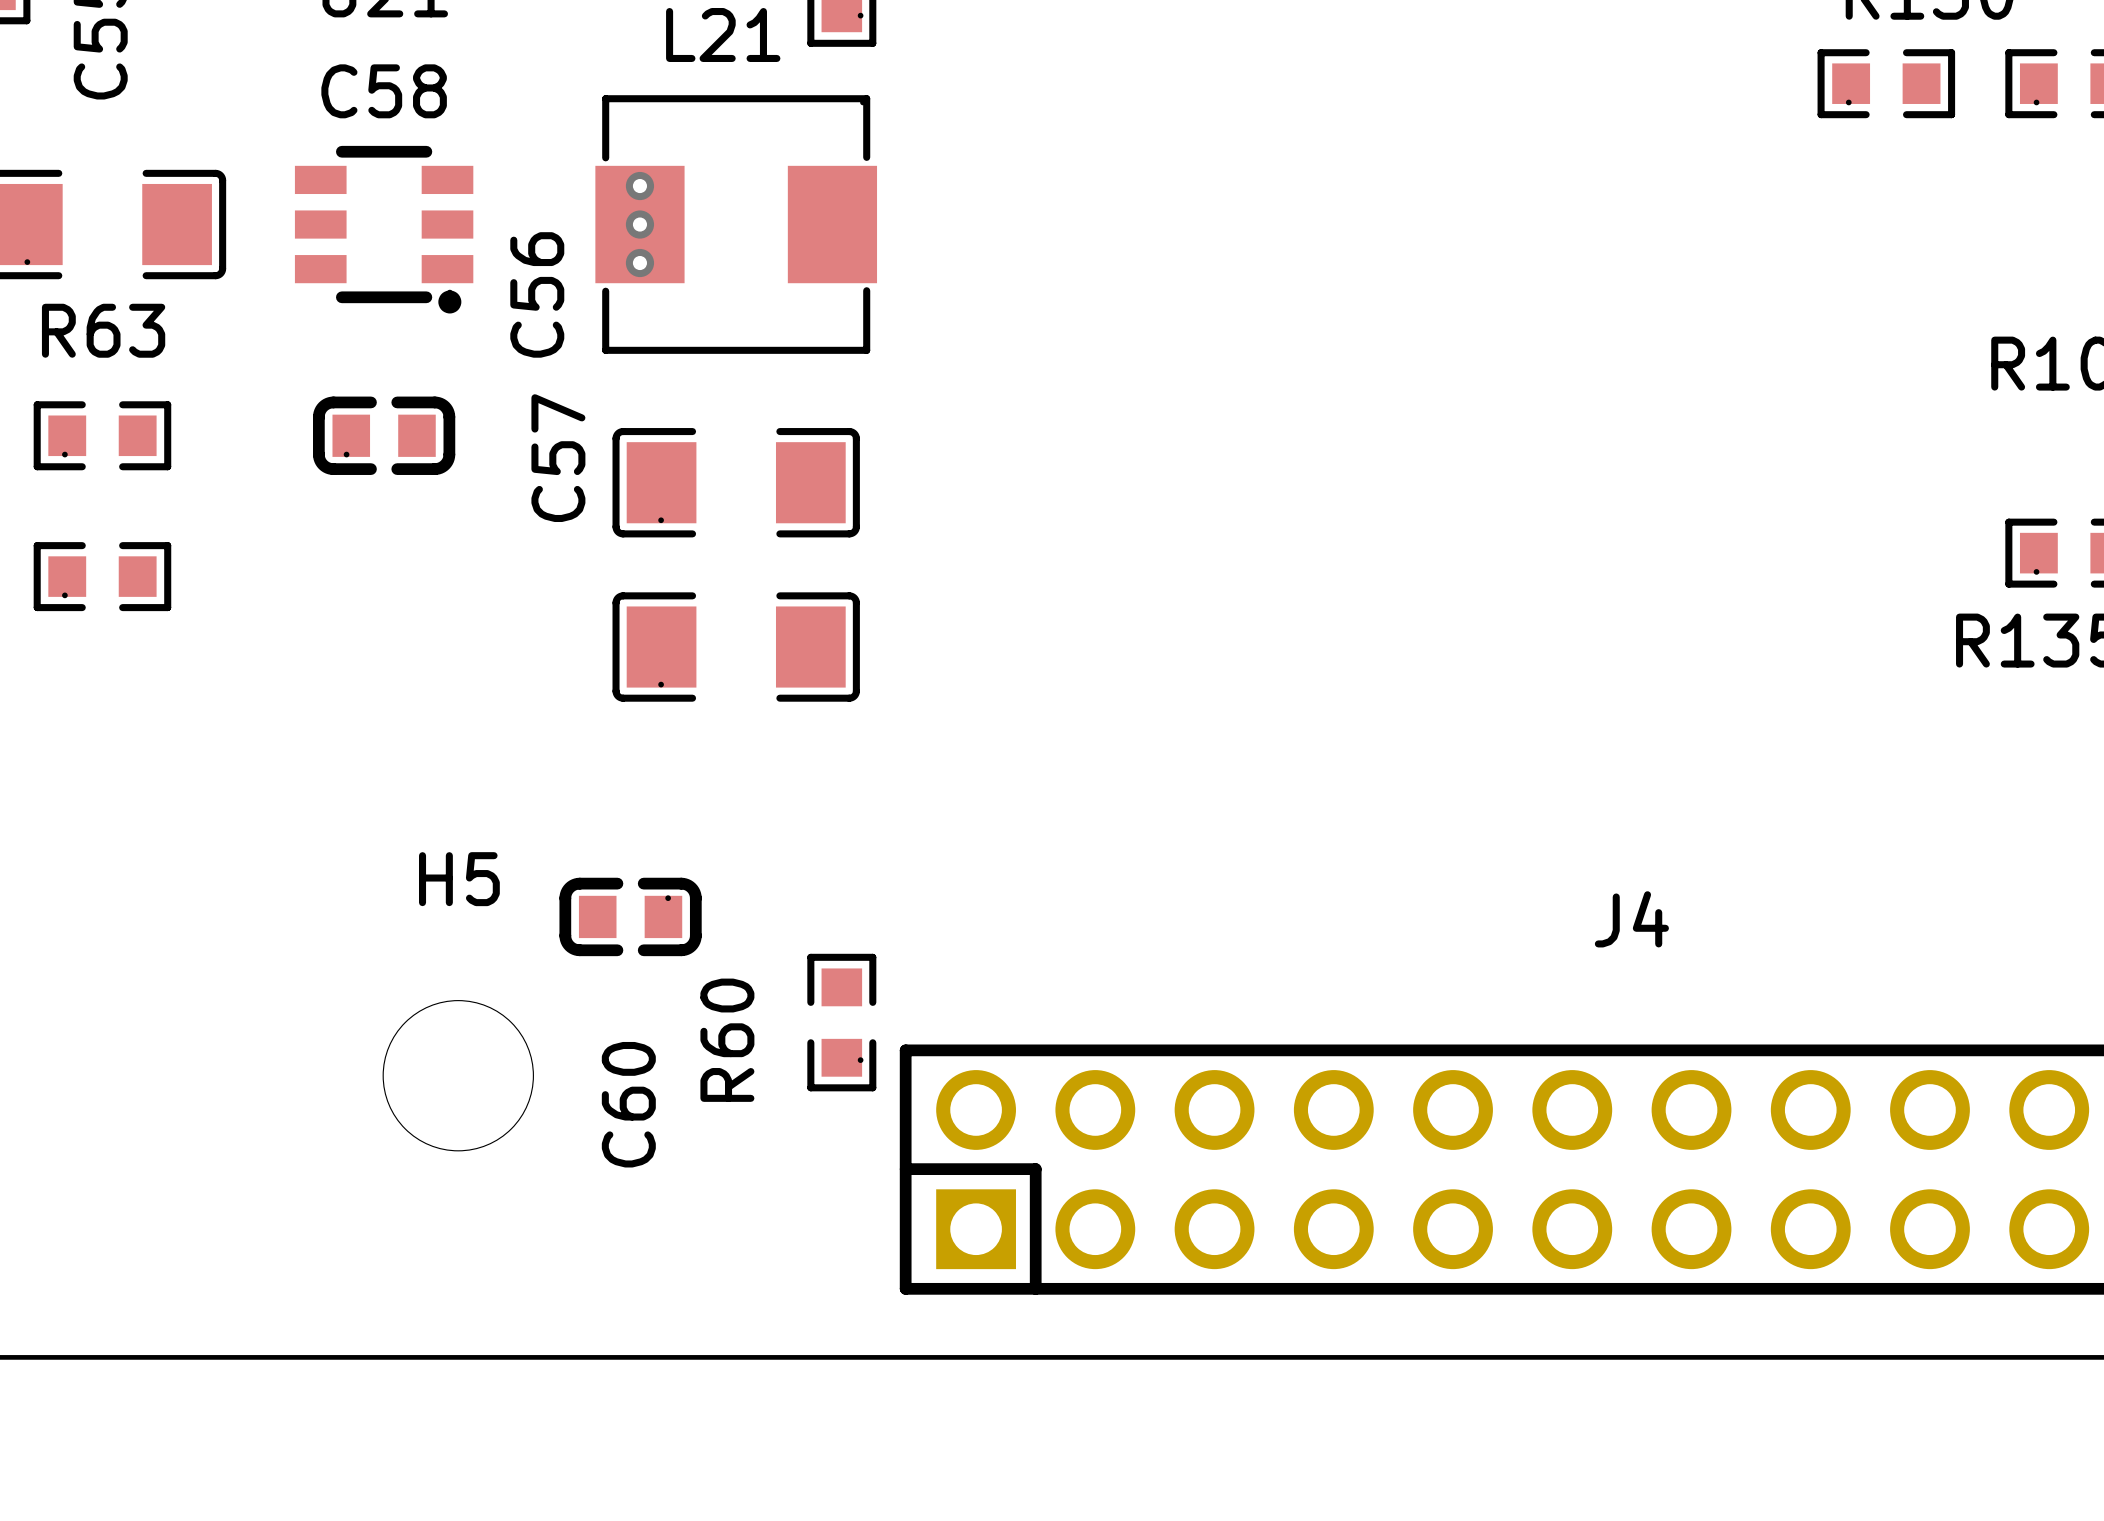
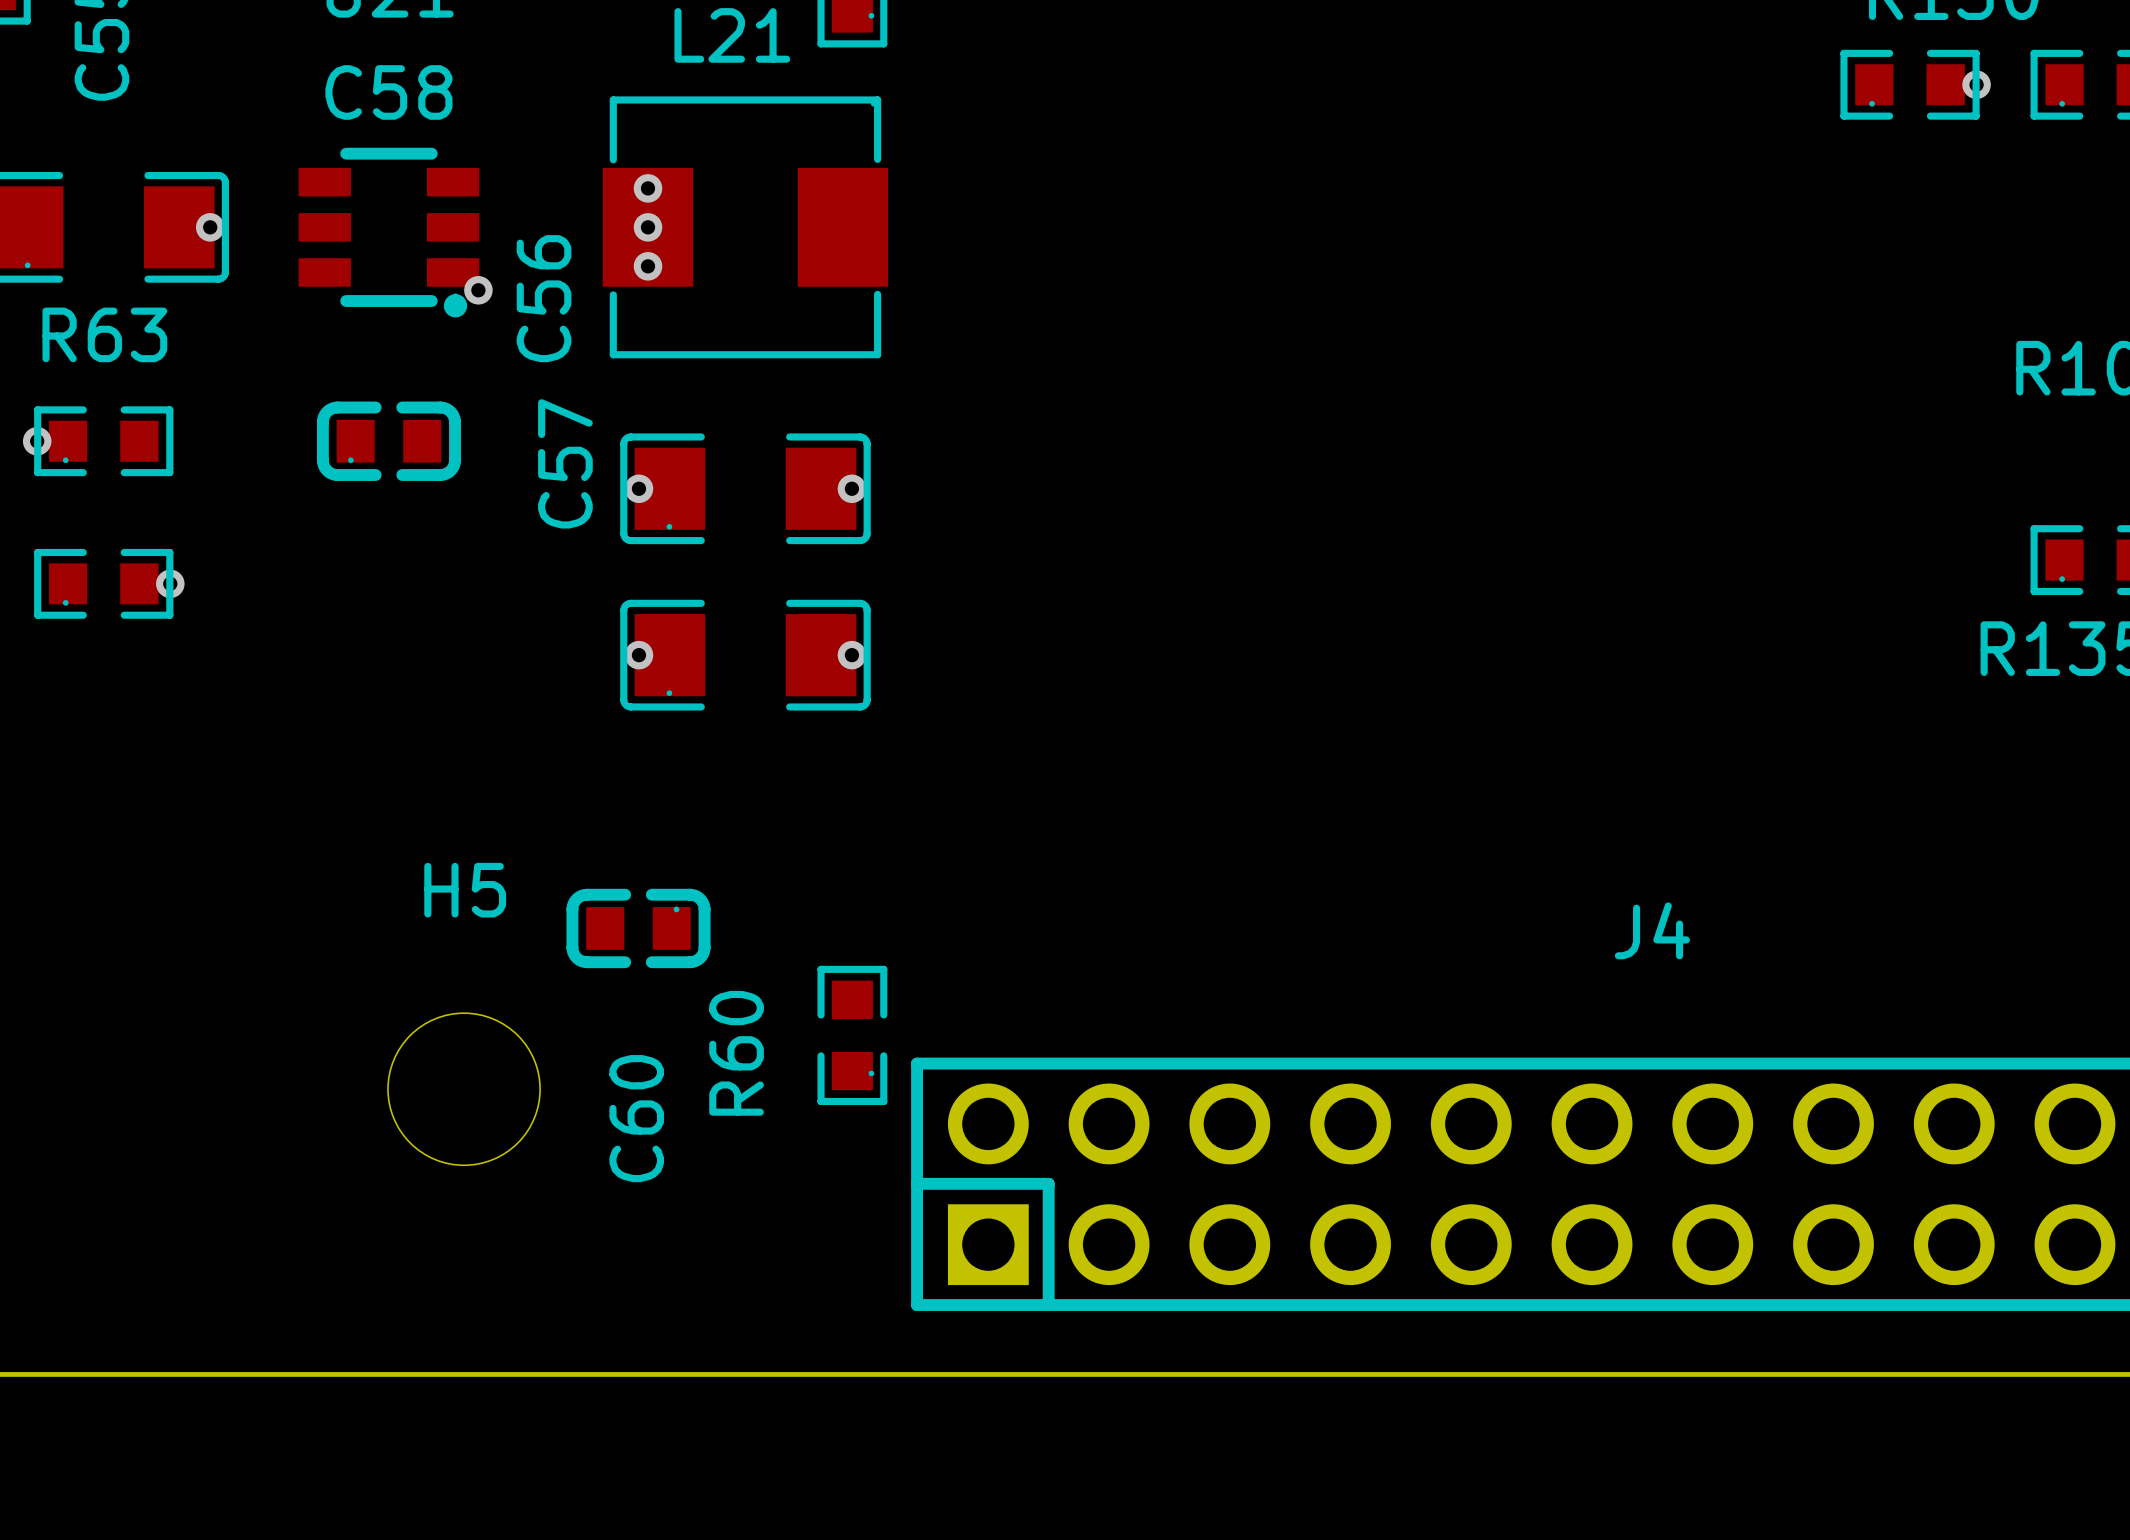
via: none -> (1976, 84)
via: none -> (210, 227)
via: none -> (478, 290)
via: none -> (37, 441)
via: none -> (638, 488)
via: none -> (851, 488)
via: none -> (170, 583)
via: none -> (638, 655)
via: none -> (851, 655)

